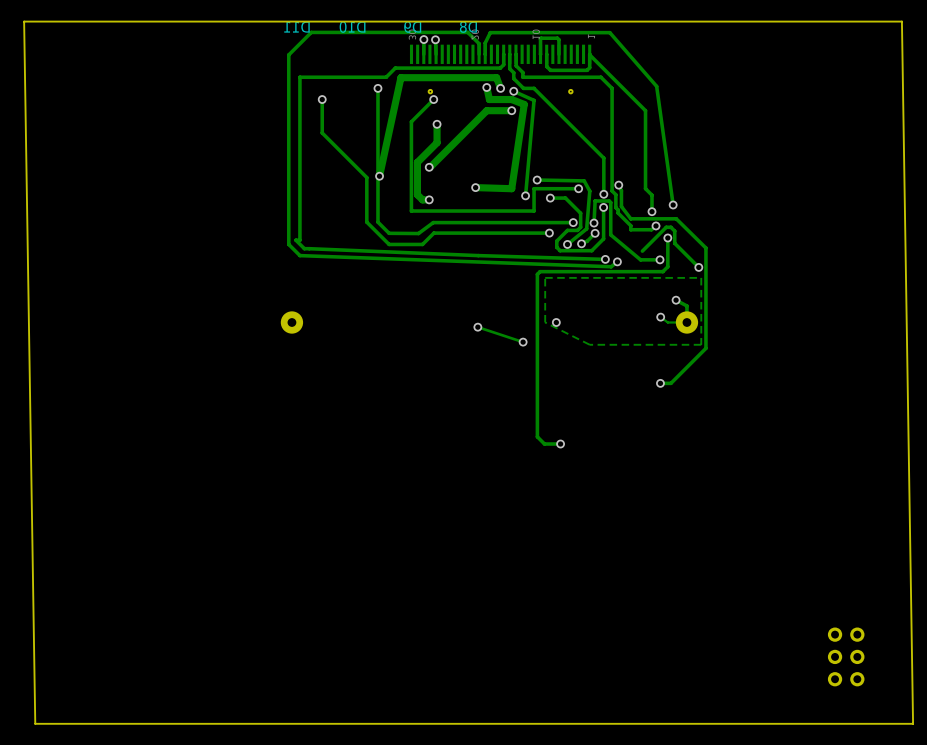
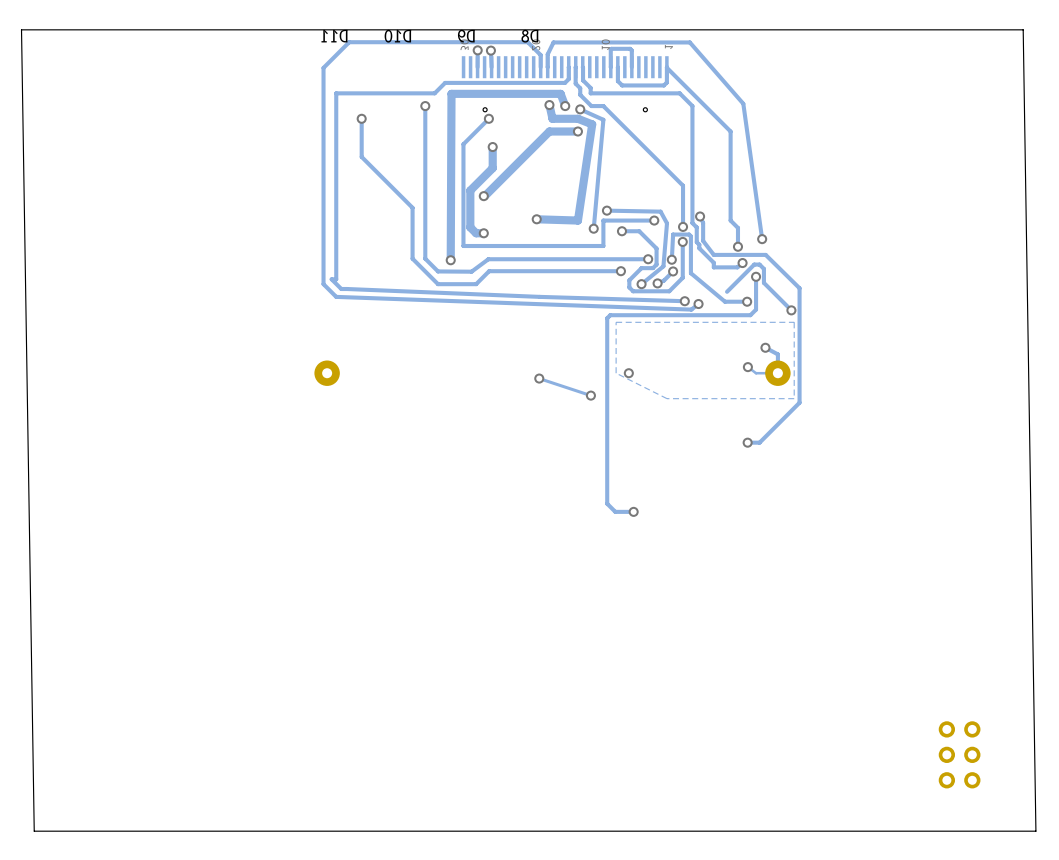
track: (400, 77) (379, 176) -> (451, 93) (450, 260)
via position: (379, 176) -> (450, 260)

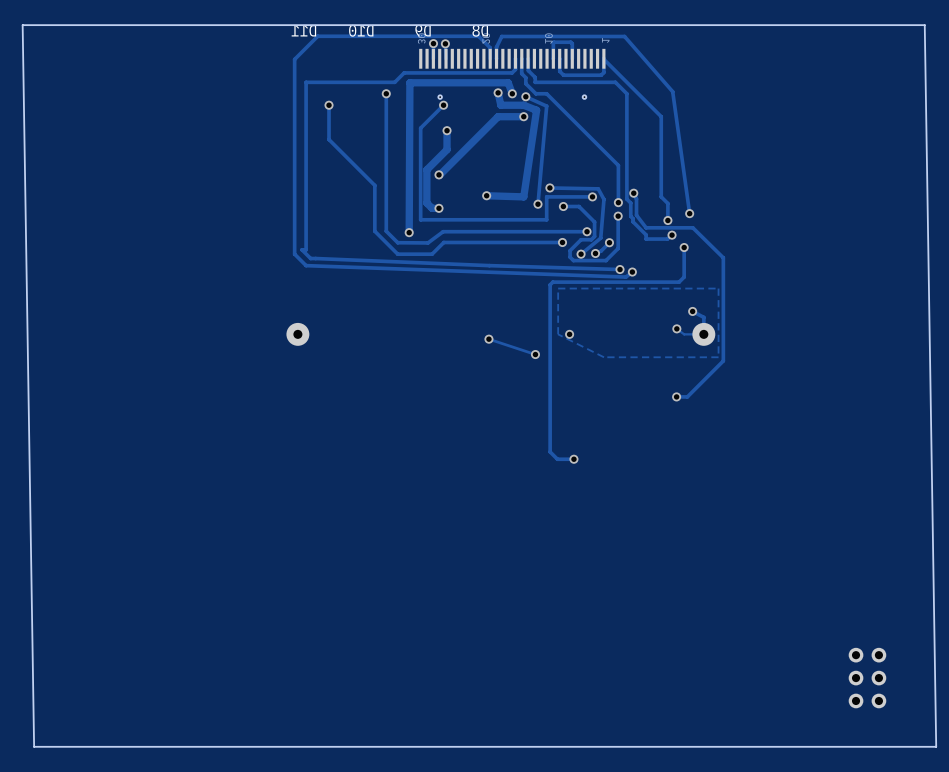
track: (671, 259) (673, 234) (689, 234) (690, 236) (690, 273) (725, 301) (747, 301) -> none
via: (671, 259) -> none
track: (727, 291) (754, 264) (759, 264) (763, 268) (763, 282) (791, 310) -> none
via: (747, 301) -> none
via: (791, 310) -> none

